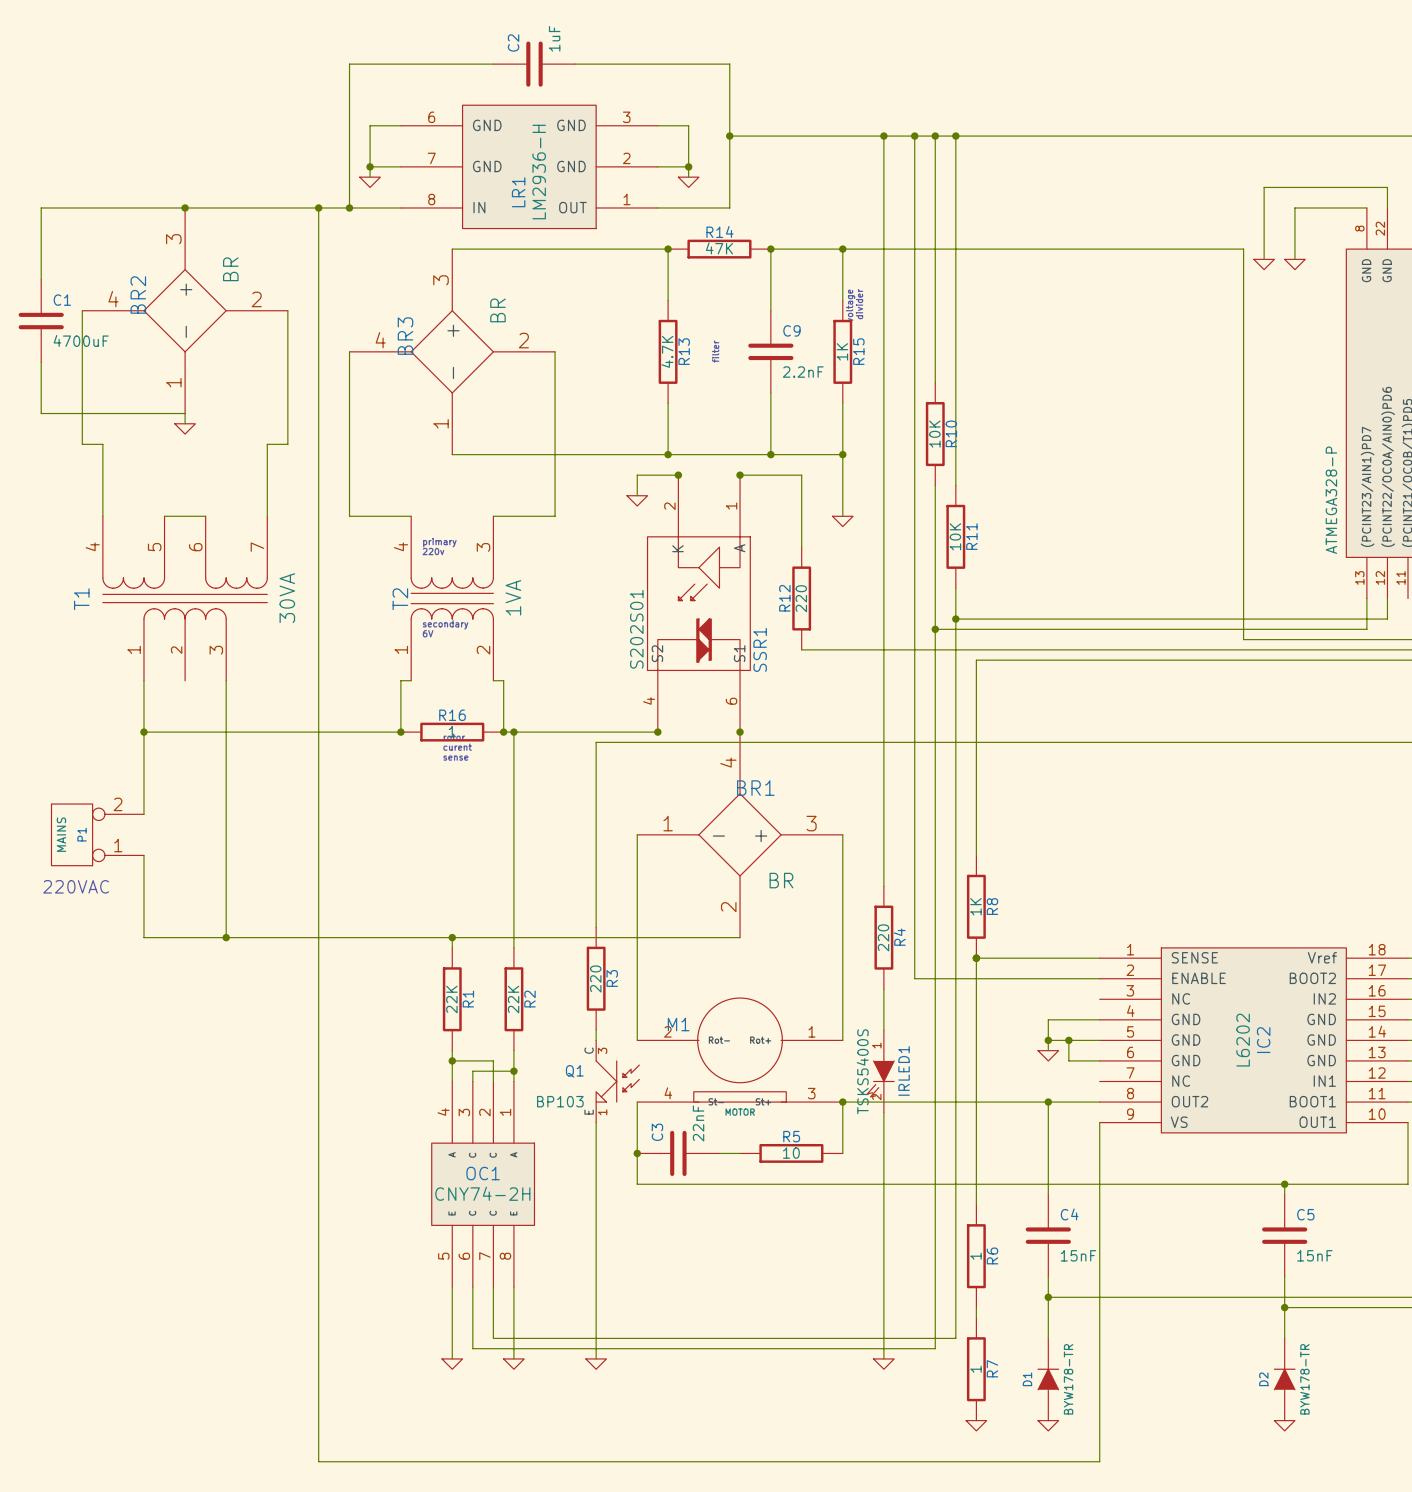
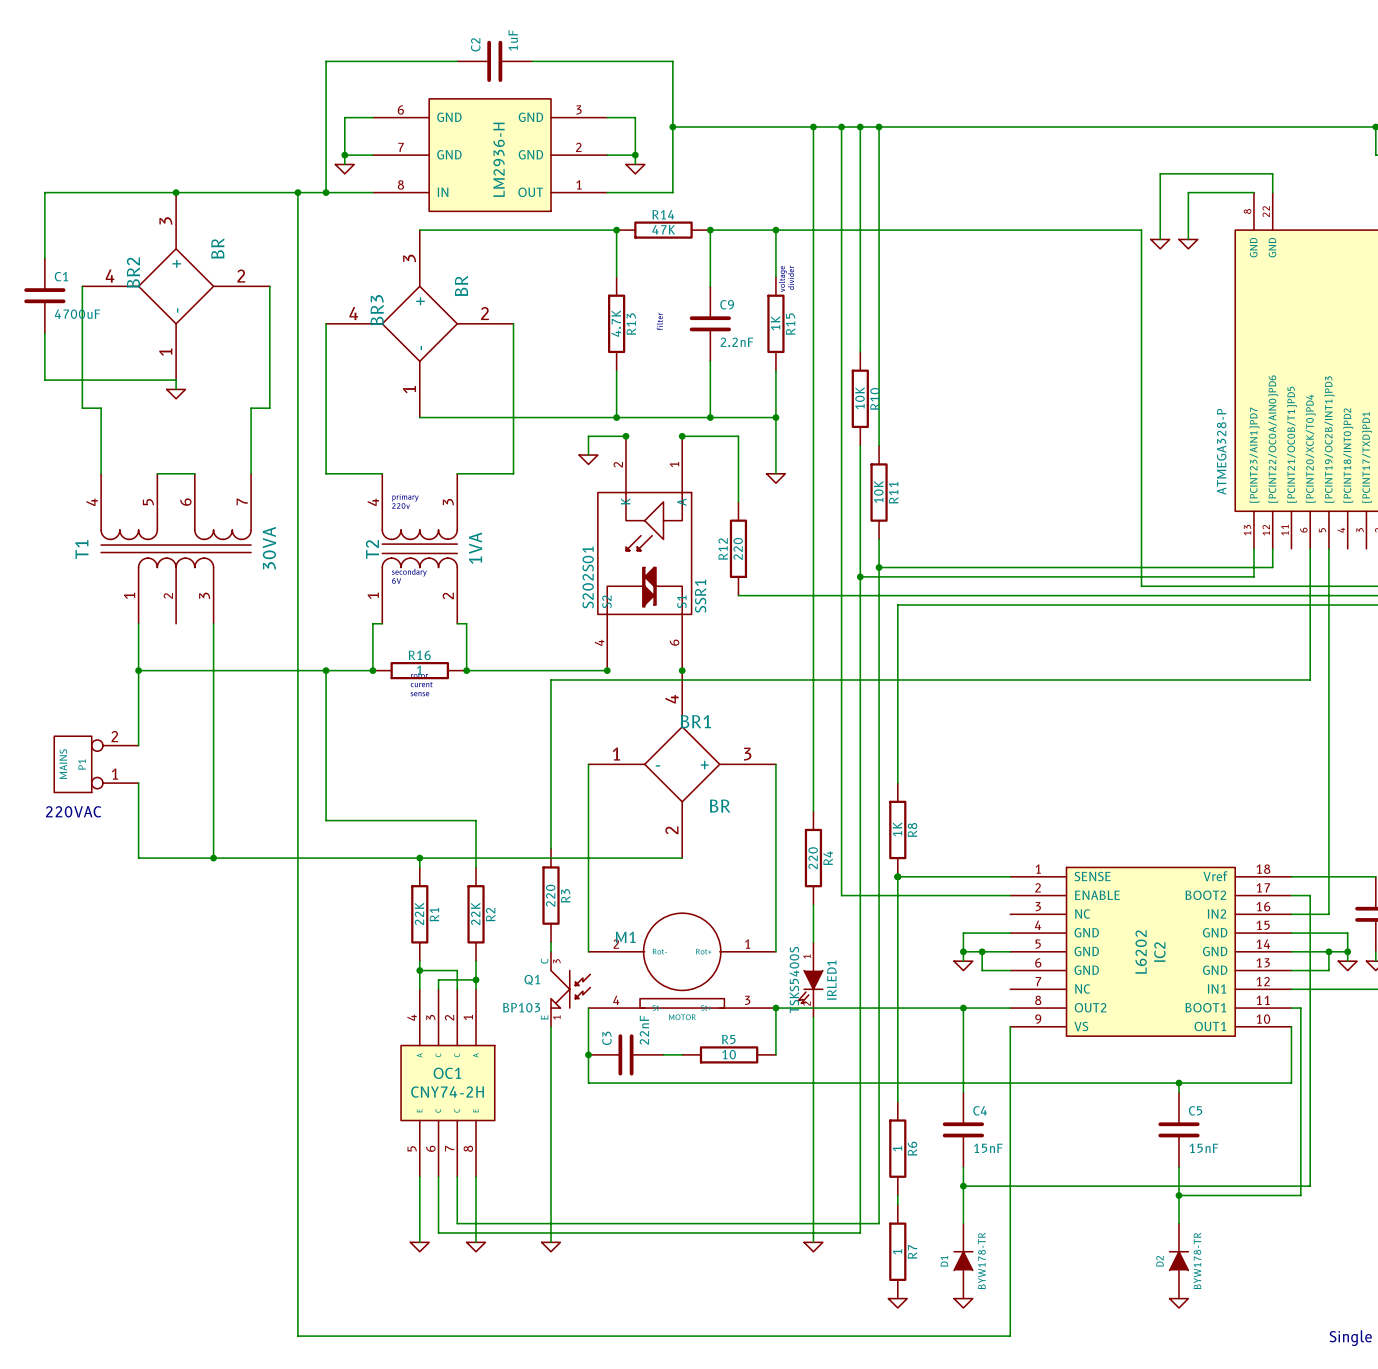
LR1 name: LR1 (518, 192) -> none
junction: none -> (326, 670)
wire: (513, 732) (513, 896) -> (326, 670) (326, 820) (476, 820)
junction: (513, 732) -> none

